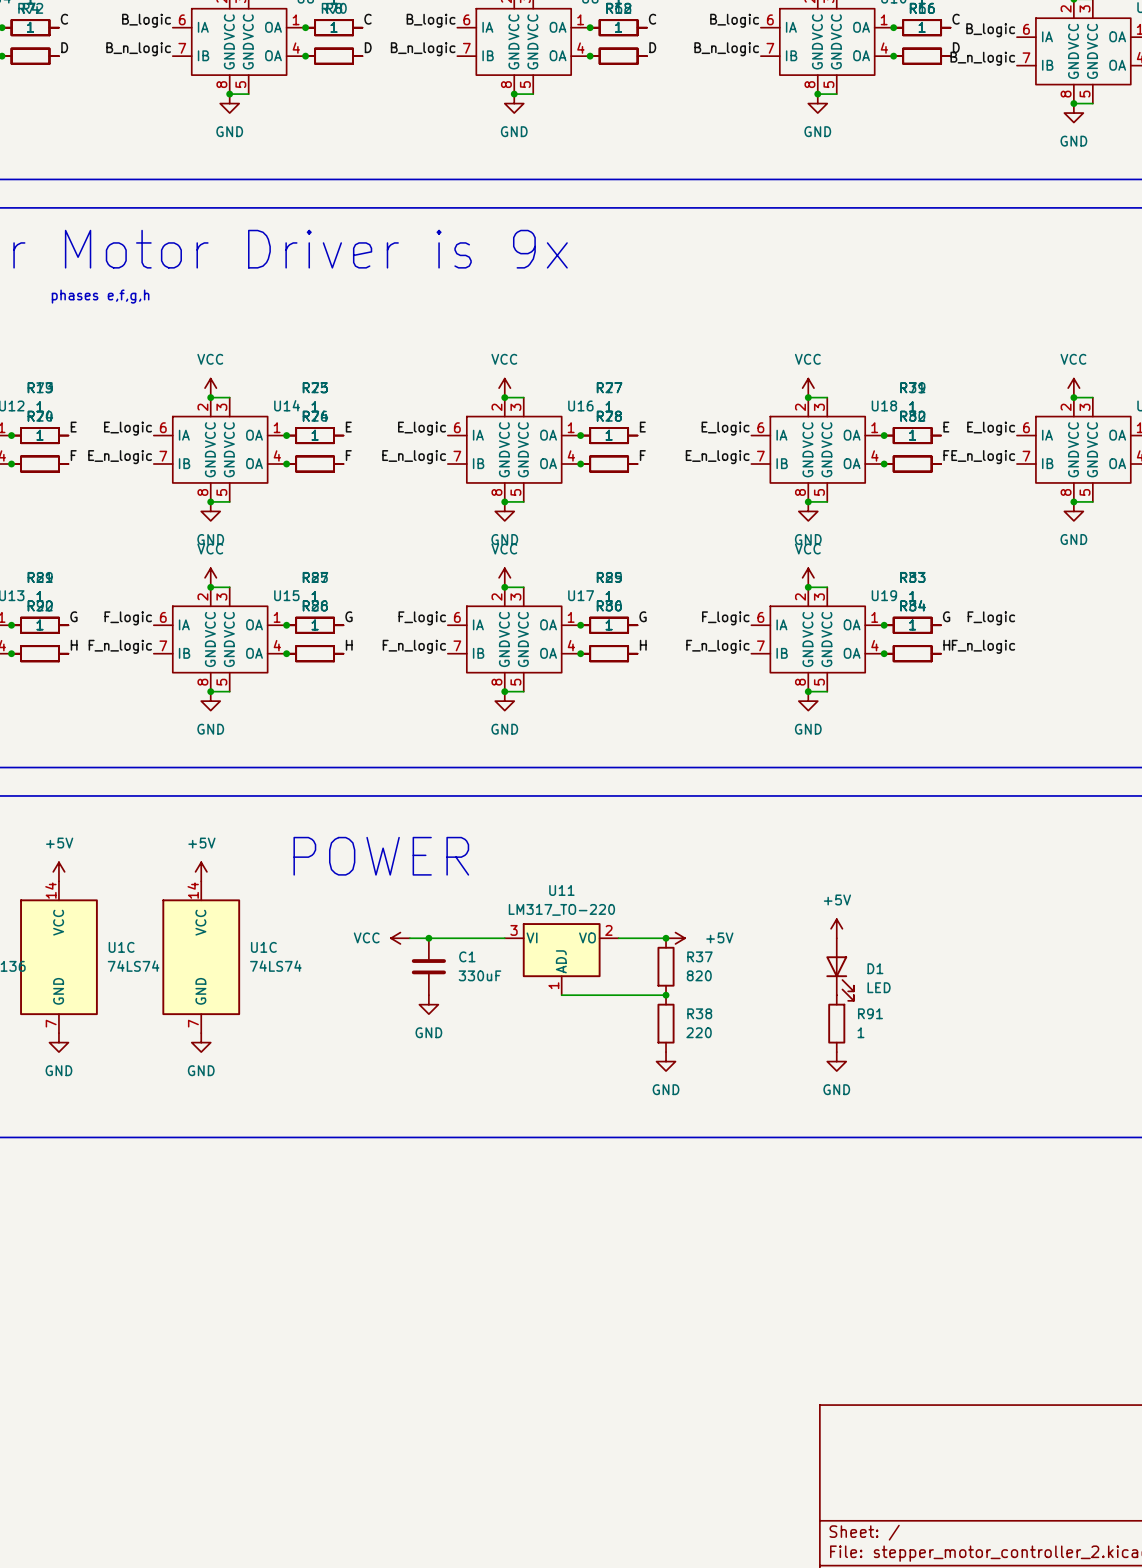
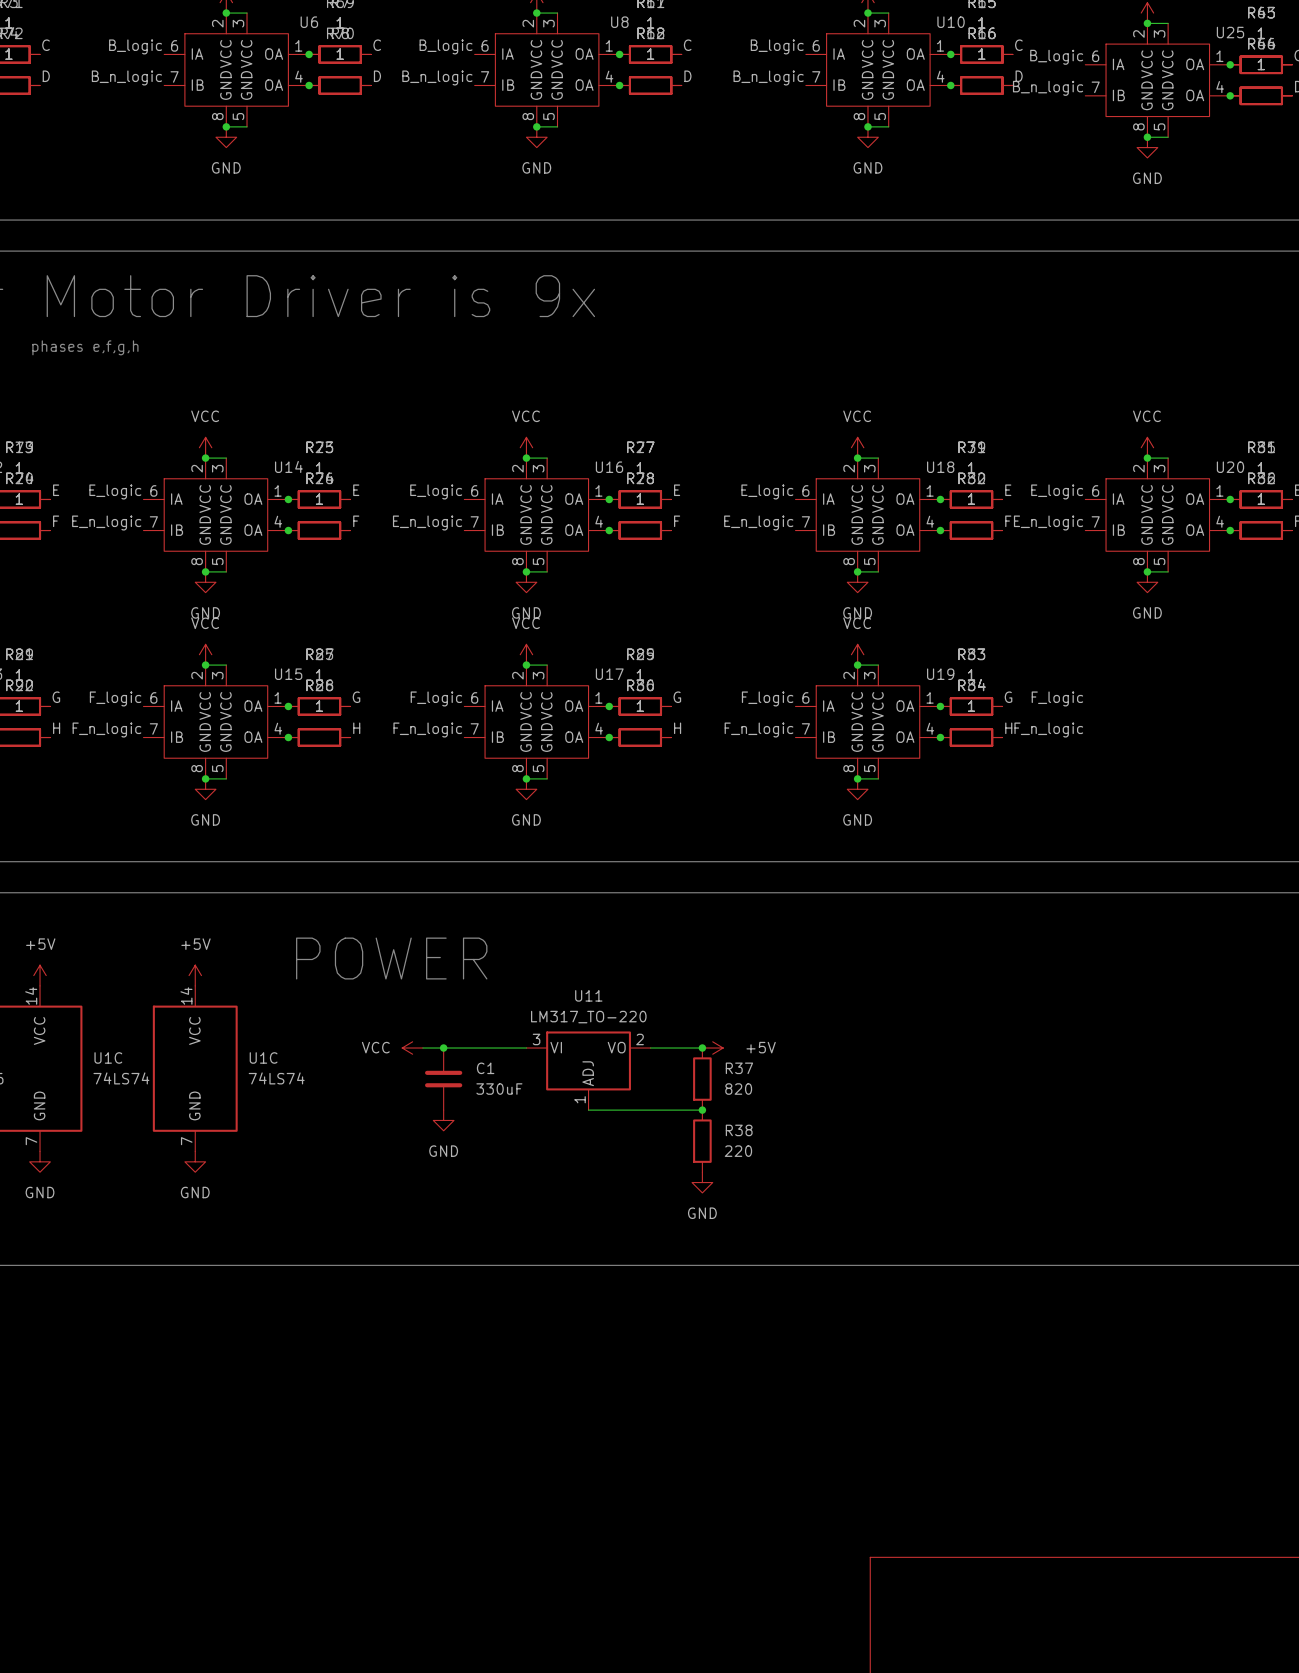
power symbol: +5V (836, 928) -> none
D1: LED (840, 969) -> none
R91: 1 (836, 1023) -> none
power symbol: GND (836, 1061) -> none

